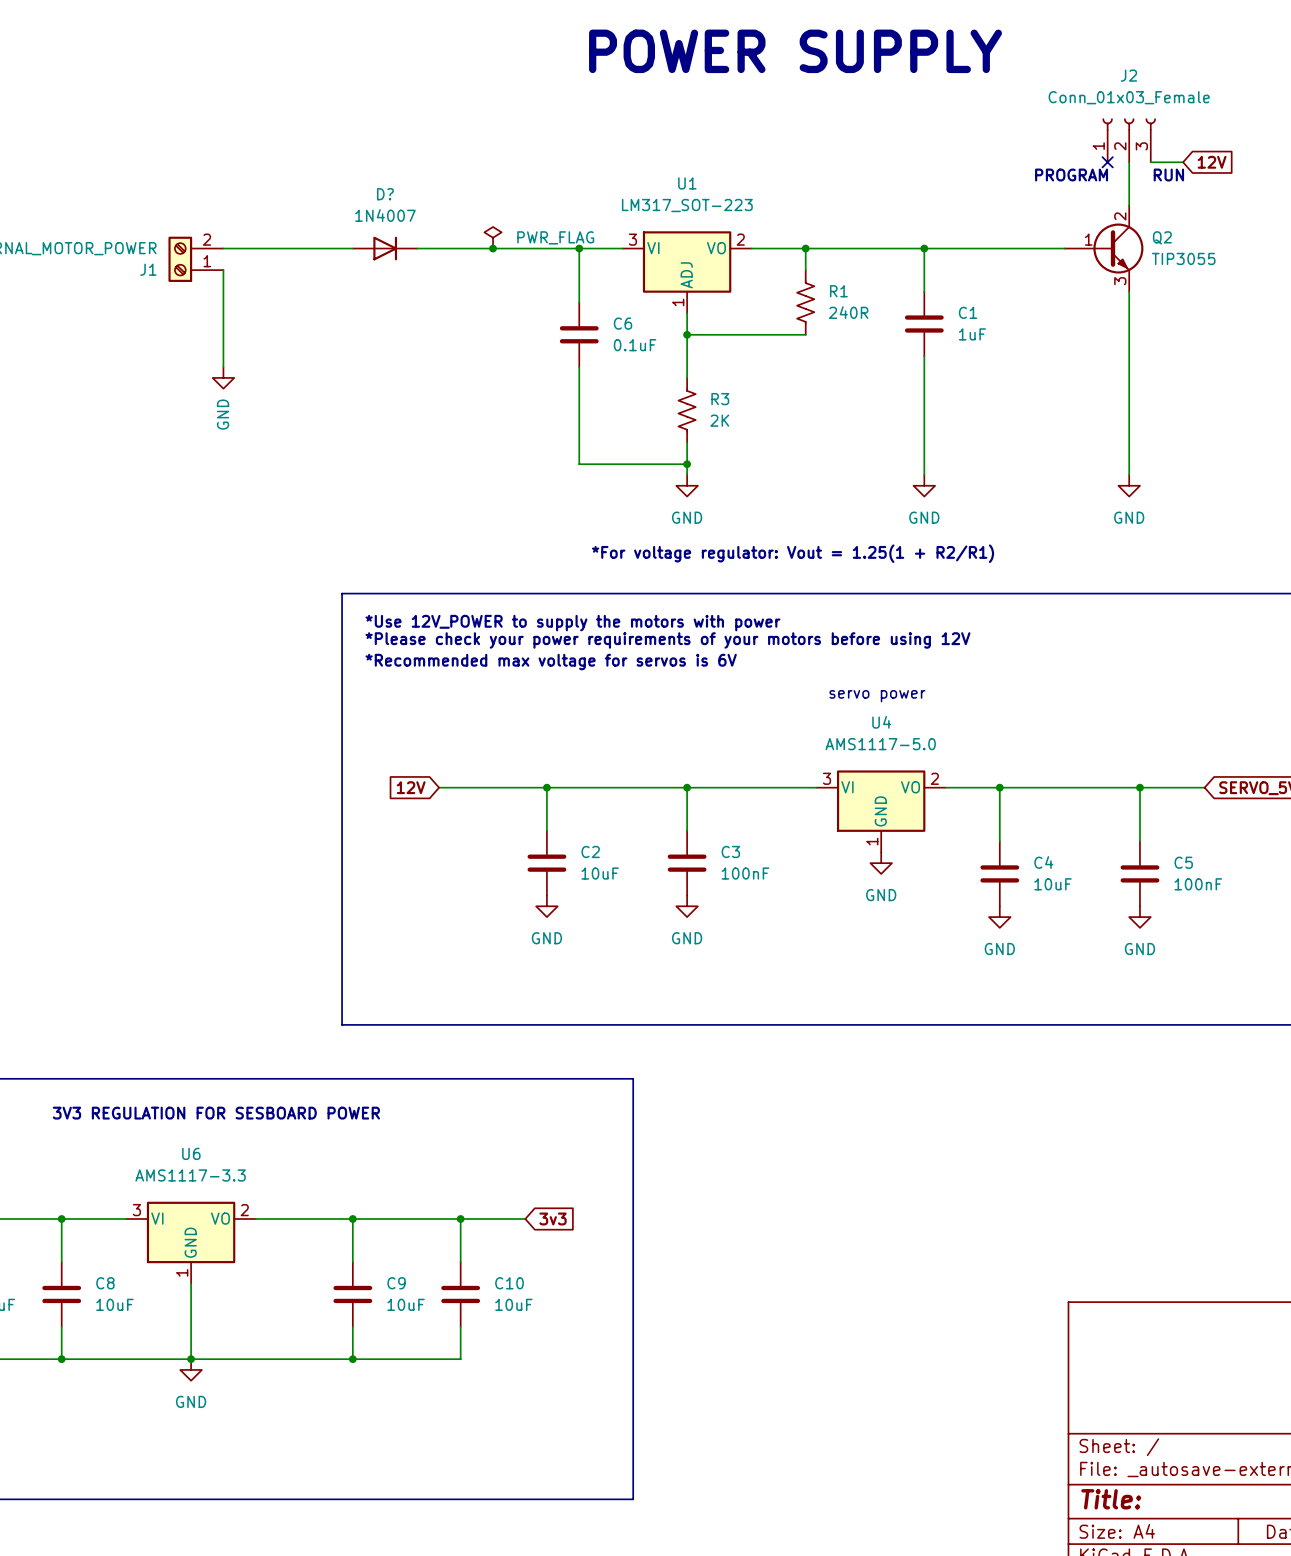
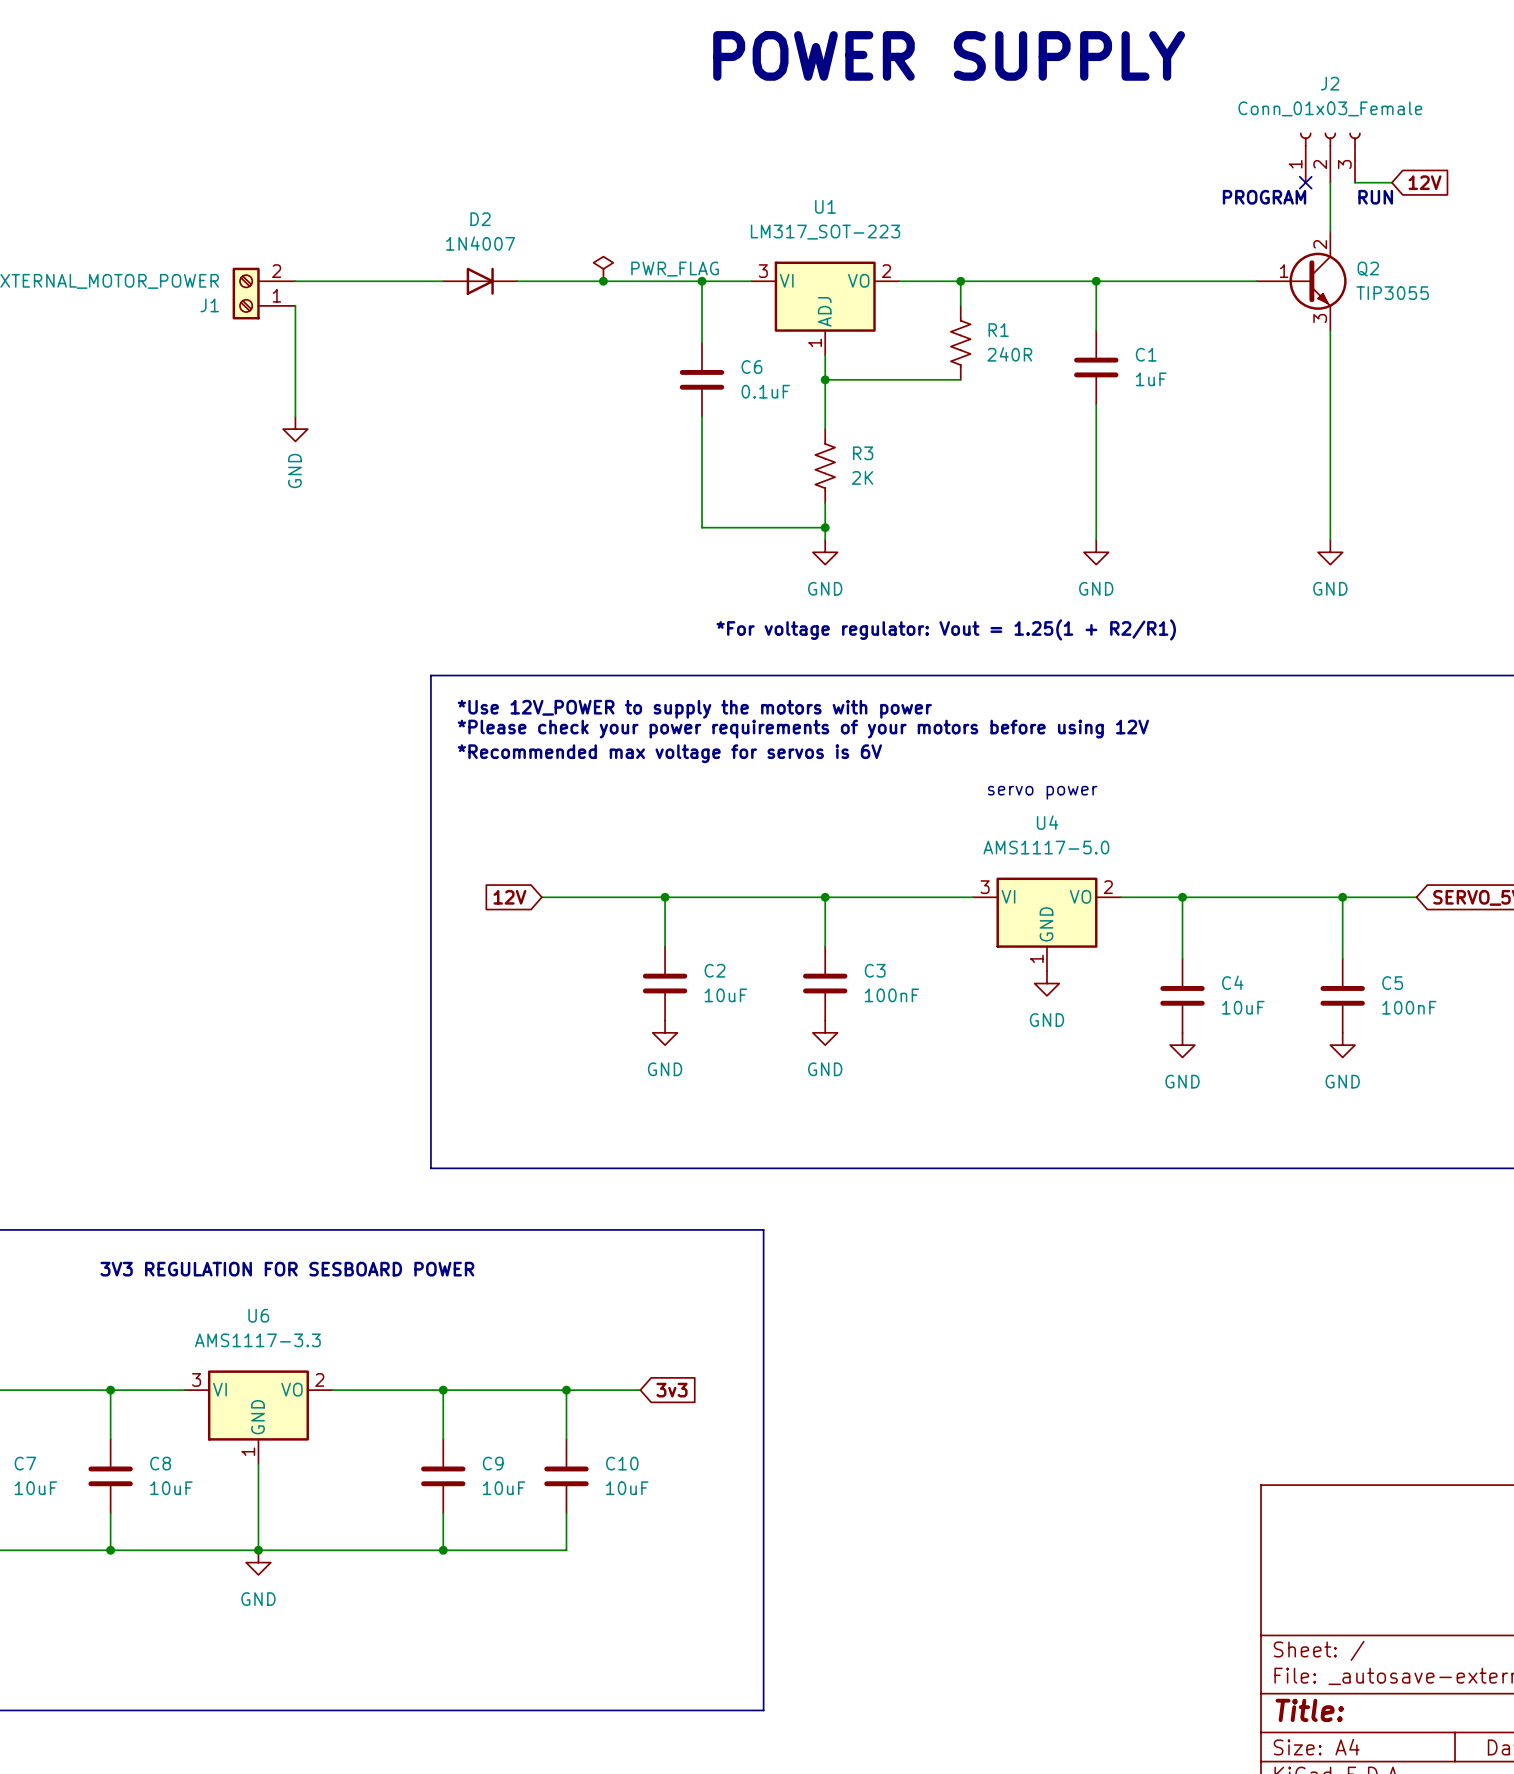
D? name: D? (385, 194) -> D2 (480, 219)

